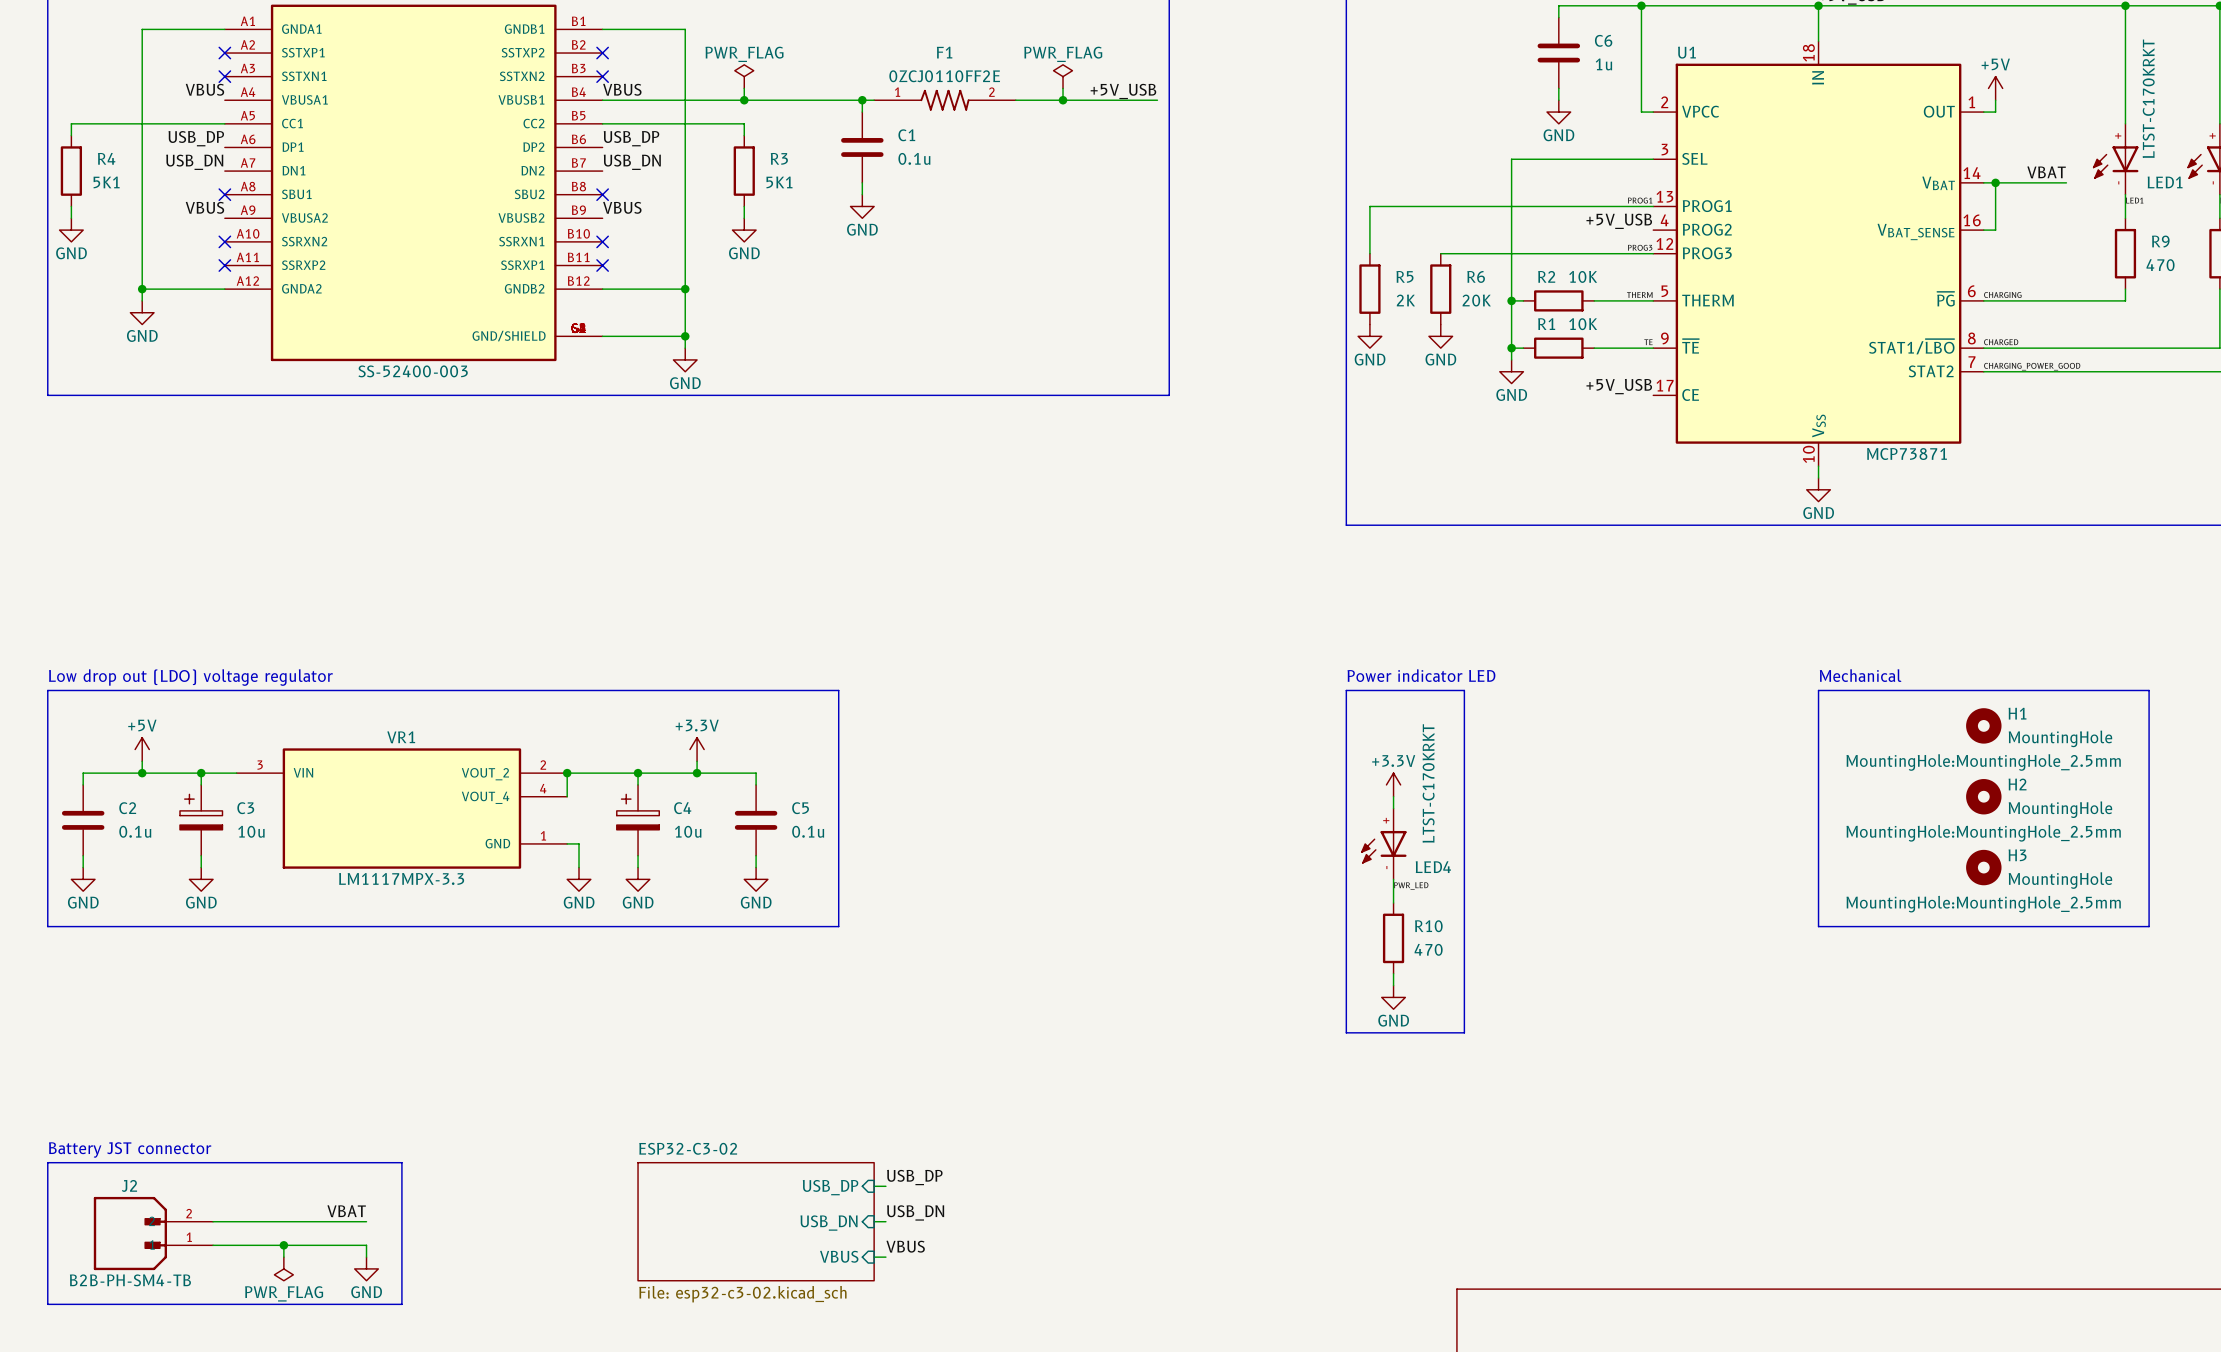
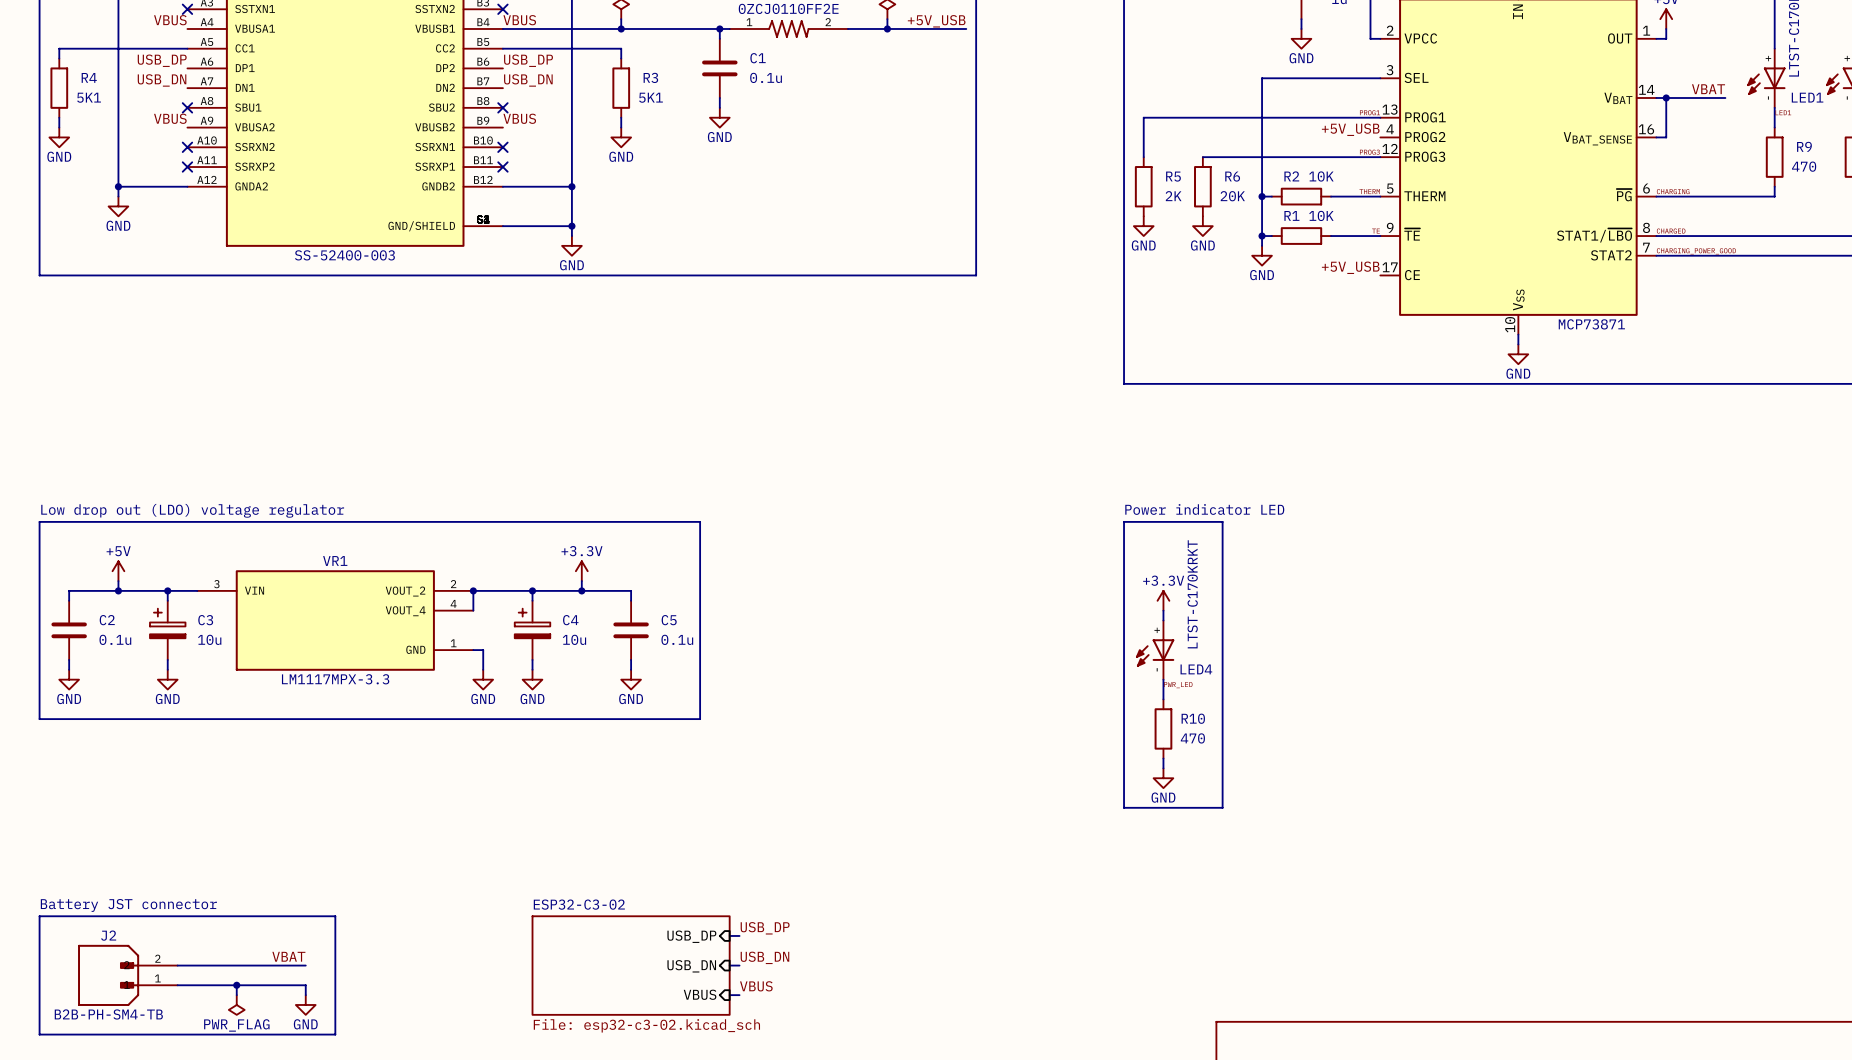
text: Mechanical (1860, 675) -> none
line: (1818, 690) (2149, 690) (2149, 926) (1818, 926) (1818, 690) -> none
H1: MountingHole (1983, 725) -> none
H2: MountingHole (1983, 796) -> none
H3: MountingHole (1983, 867) -> none

